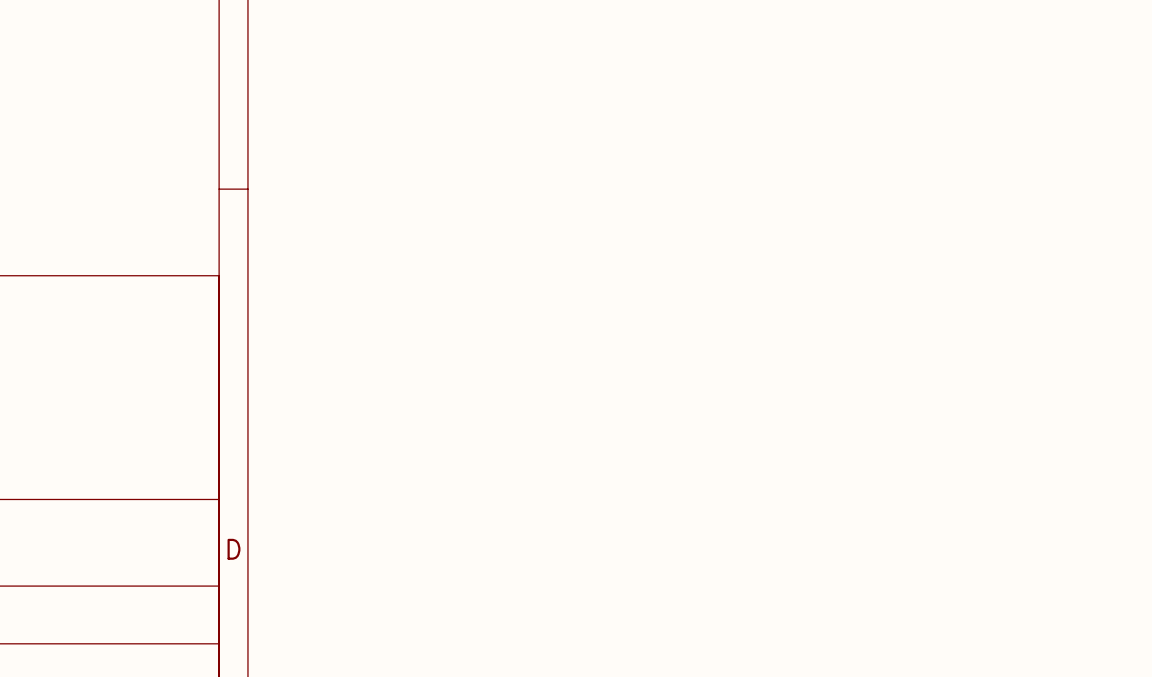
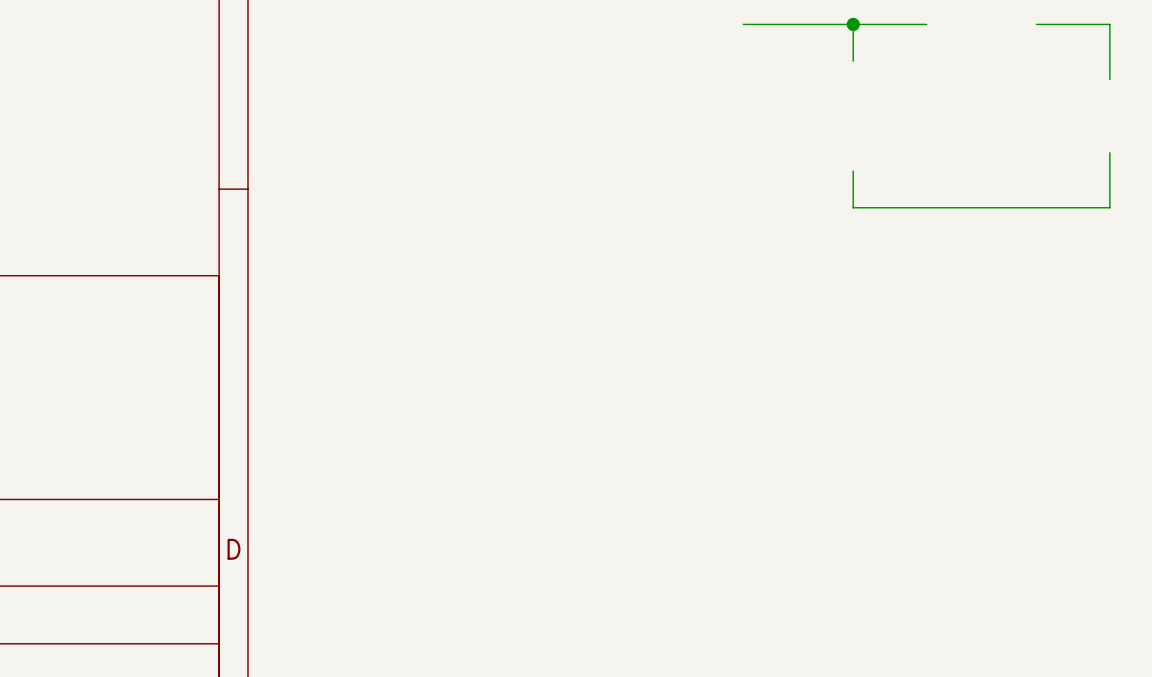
wire: none -> (743, 24) (926, 24)
wire: none -> (853, 24) (853, 61)
junction: none -> (853, 24)
wire: none -> (1036, 24) (1109, 24) (1109, 79)
wire: none -> (1109, 152) (1109, 207) (853, 207) (853, 171)

